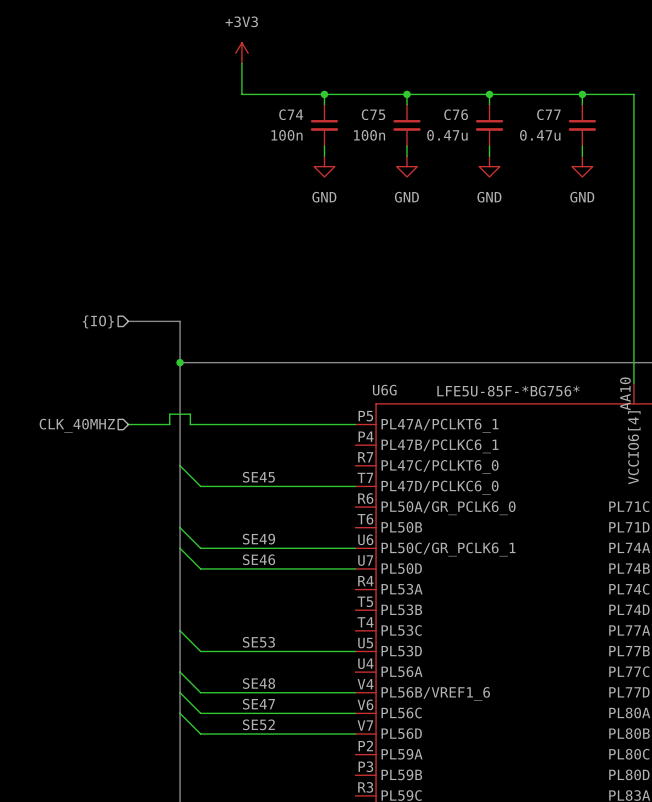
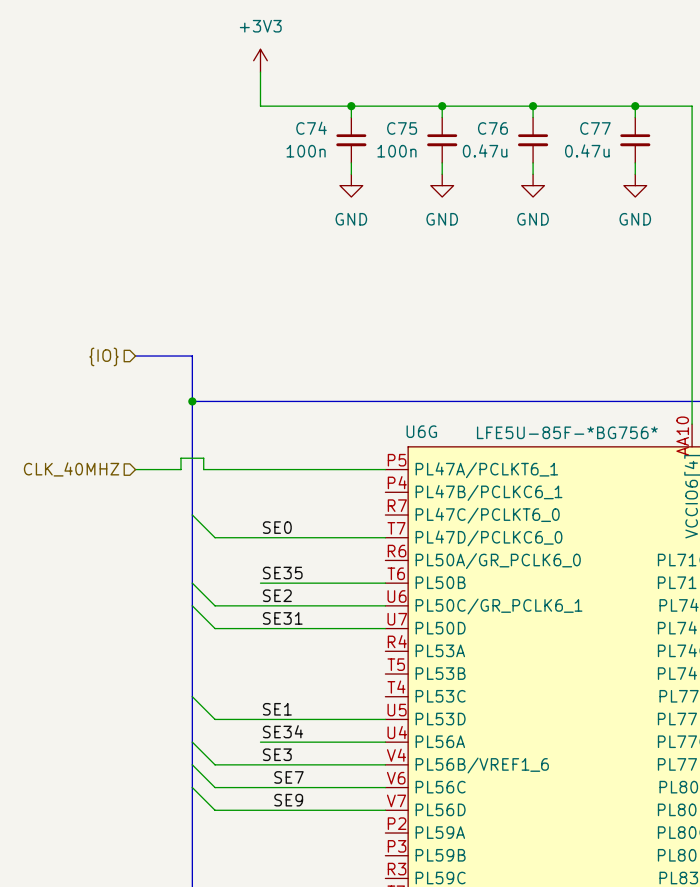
label: SE45 (258, 477) -> SE0 (277, 527)
label: none -> SE35 (282, 573)
wire: none -> (260, 583) (385, 583)
label: SE49 (258, 539) -> SE2 (277, 595)
label: SE46 (258, 559) -> SE31 (282, 618)
label: SE53 (258, 642) -> SE1 (277, 709)
label: none -> SE34 (283, 731)
wire: none -> (260, 742) (385, 742)
label: SE48 (259, 683) -> SE3 (277, 754)
label: SE47 (258, 704) -> SE7 (288, 777)
label: SE52 (258, 724) -> none
label: none -> SE9 (288, 800)

